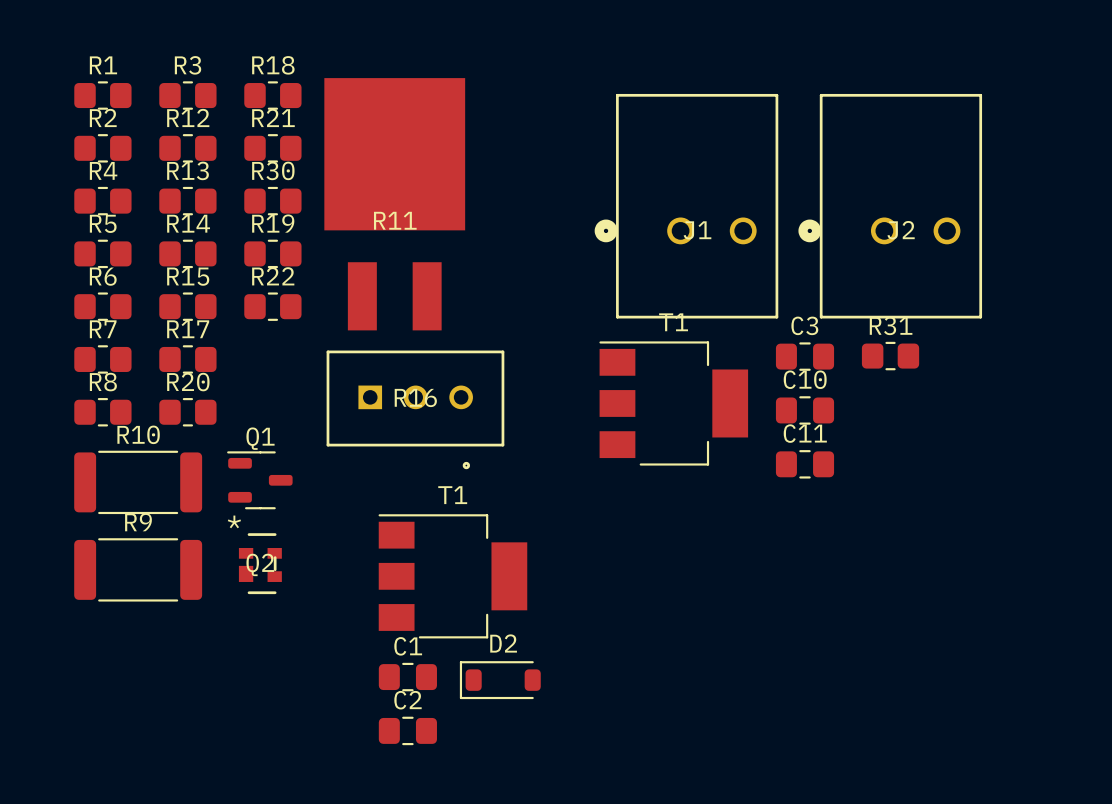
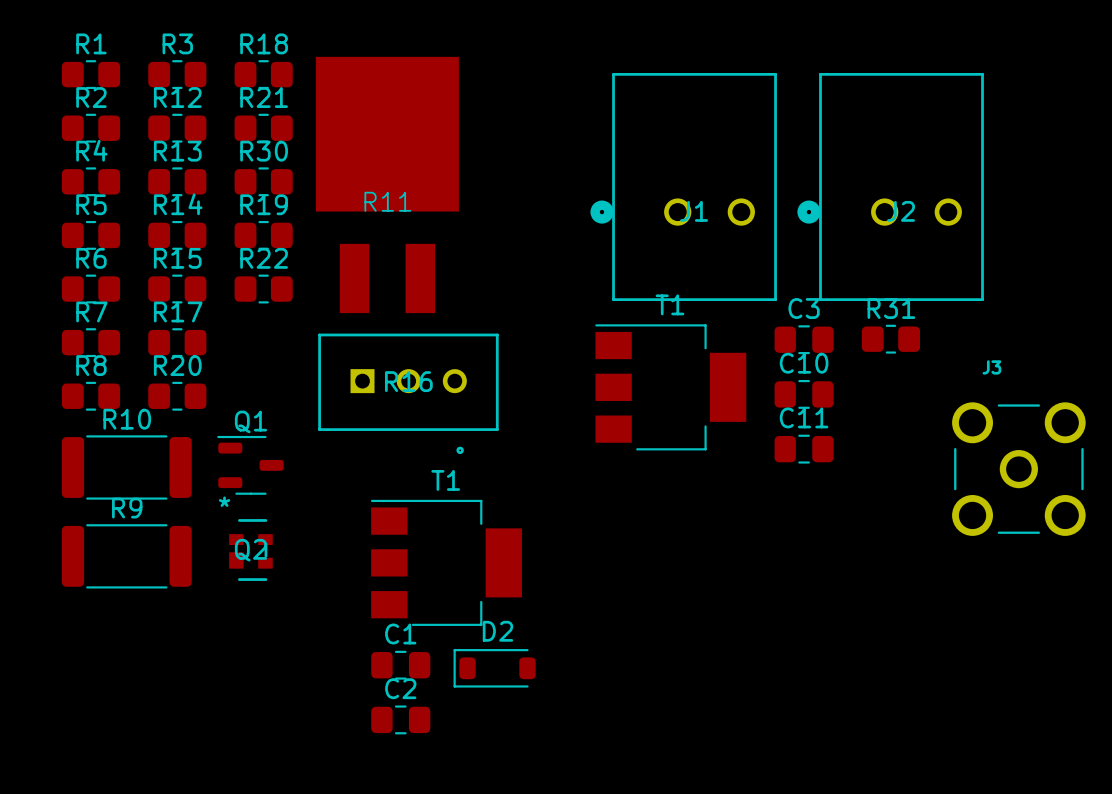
J3: none -> (1018, 469)

